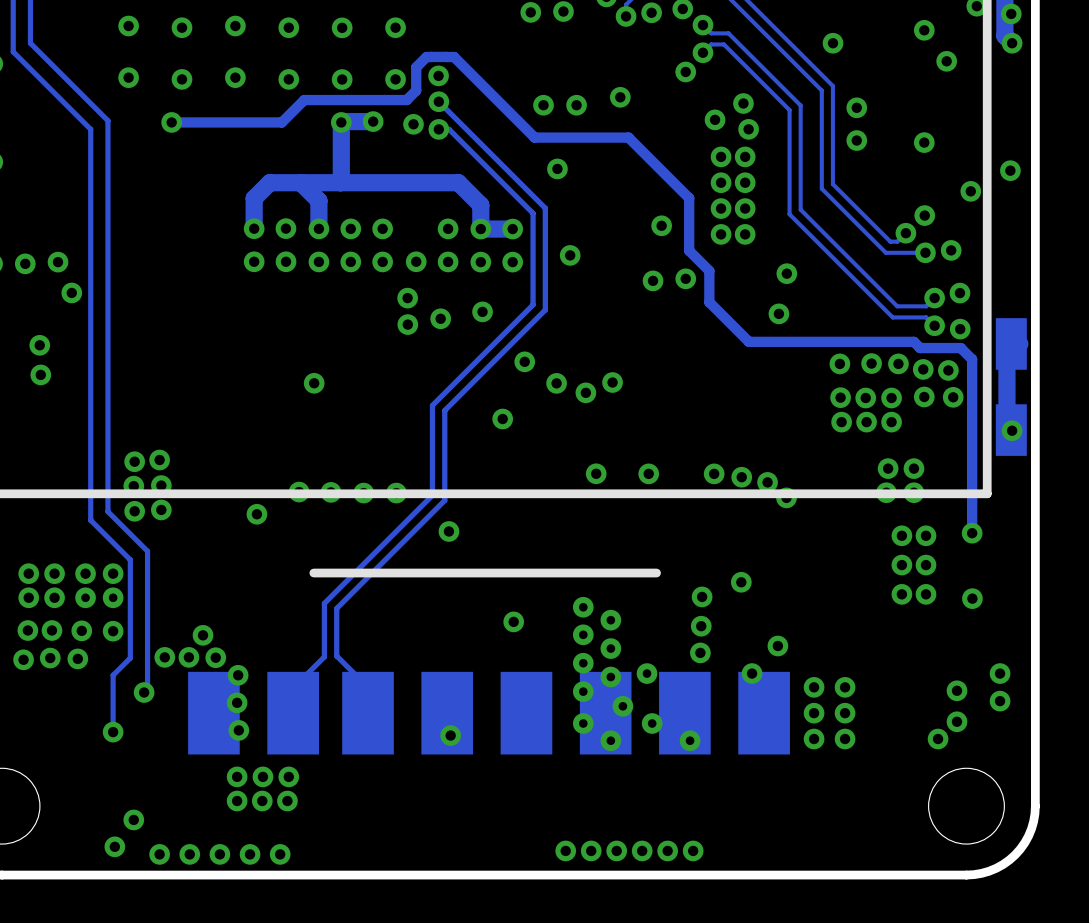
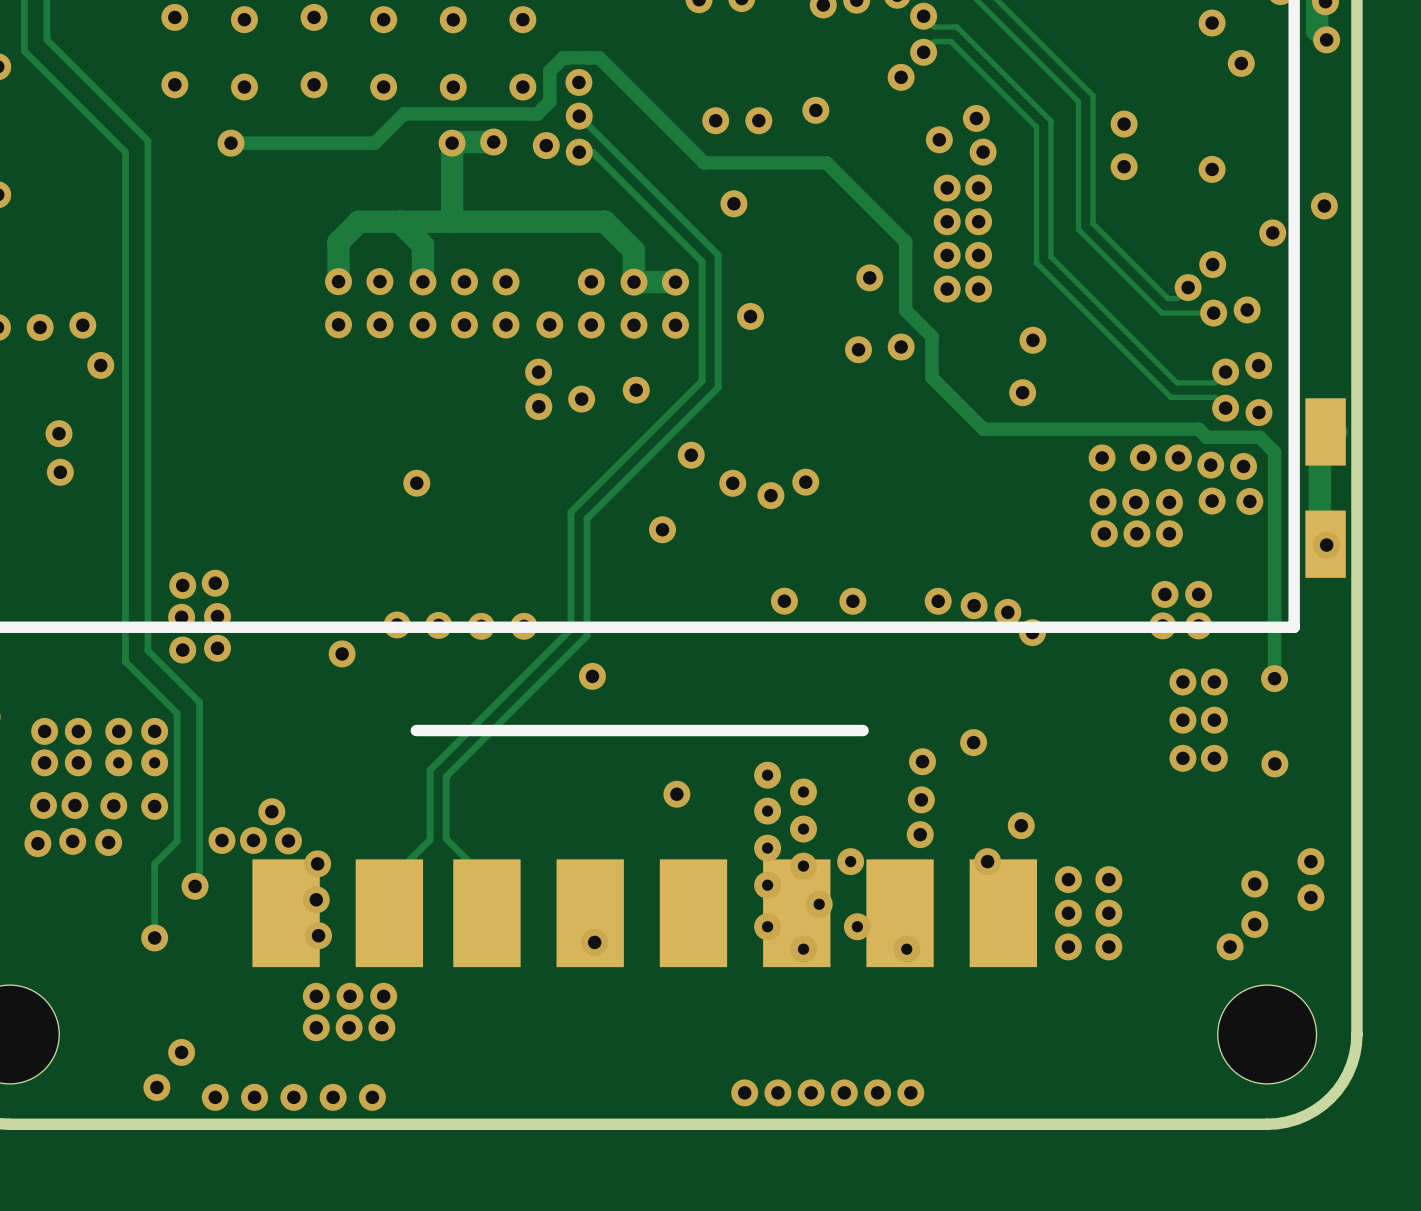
via: (833, 43) -> none

